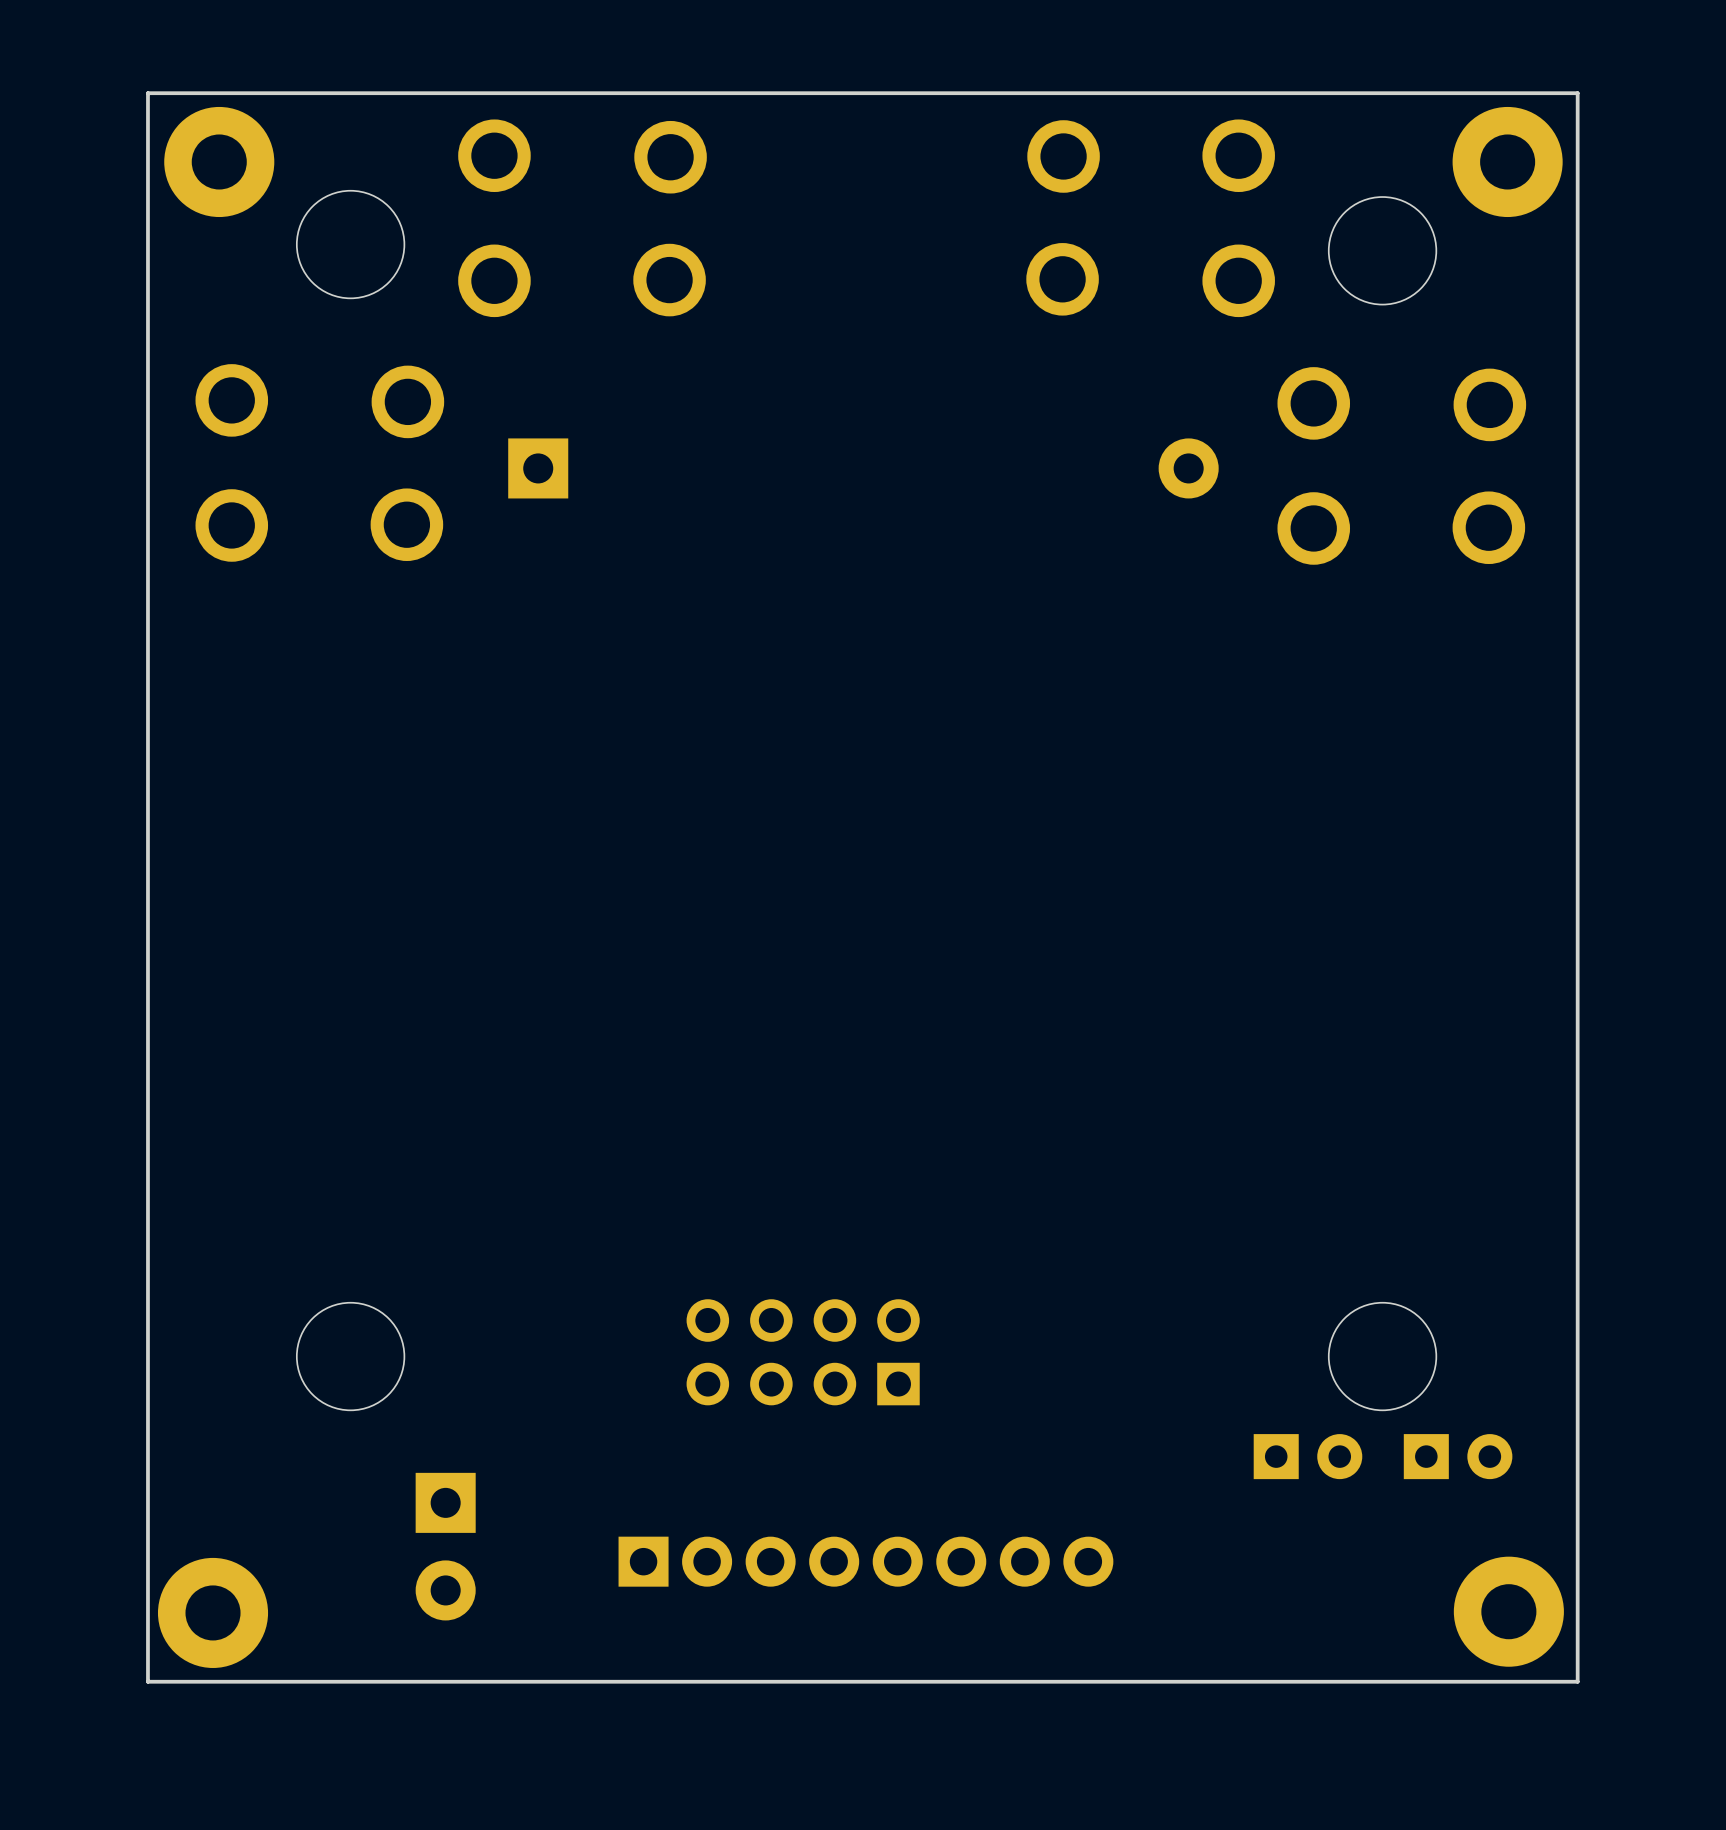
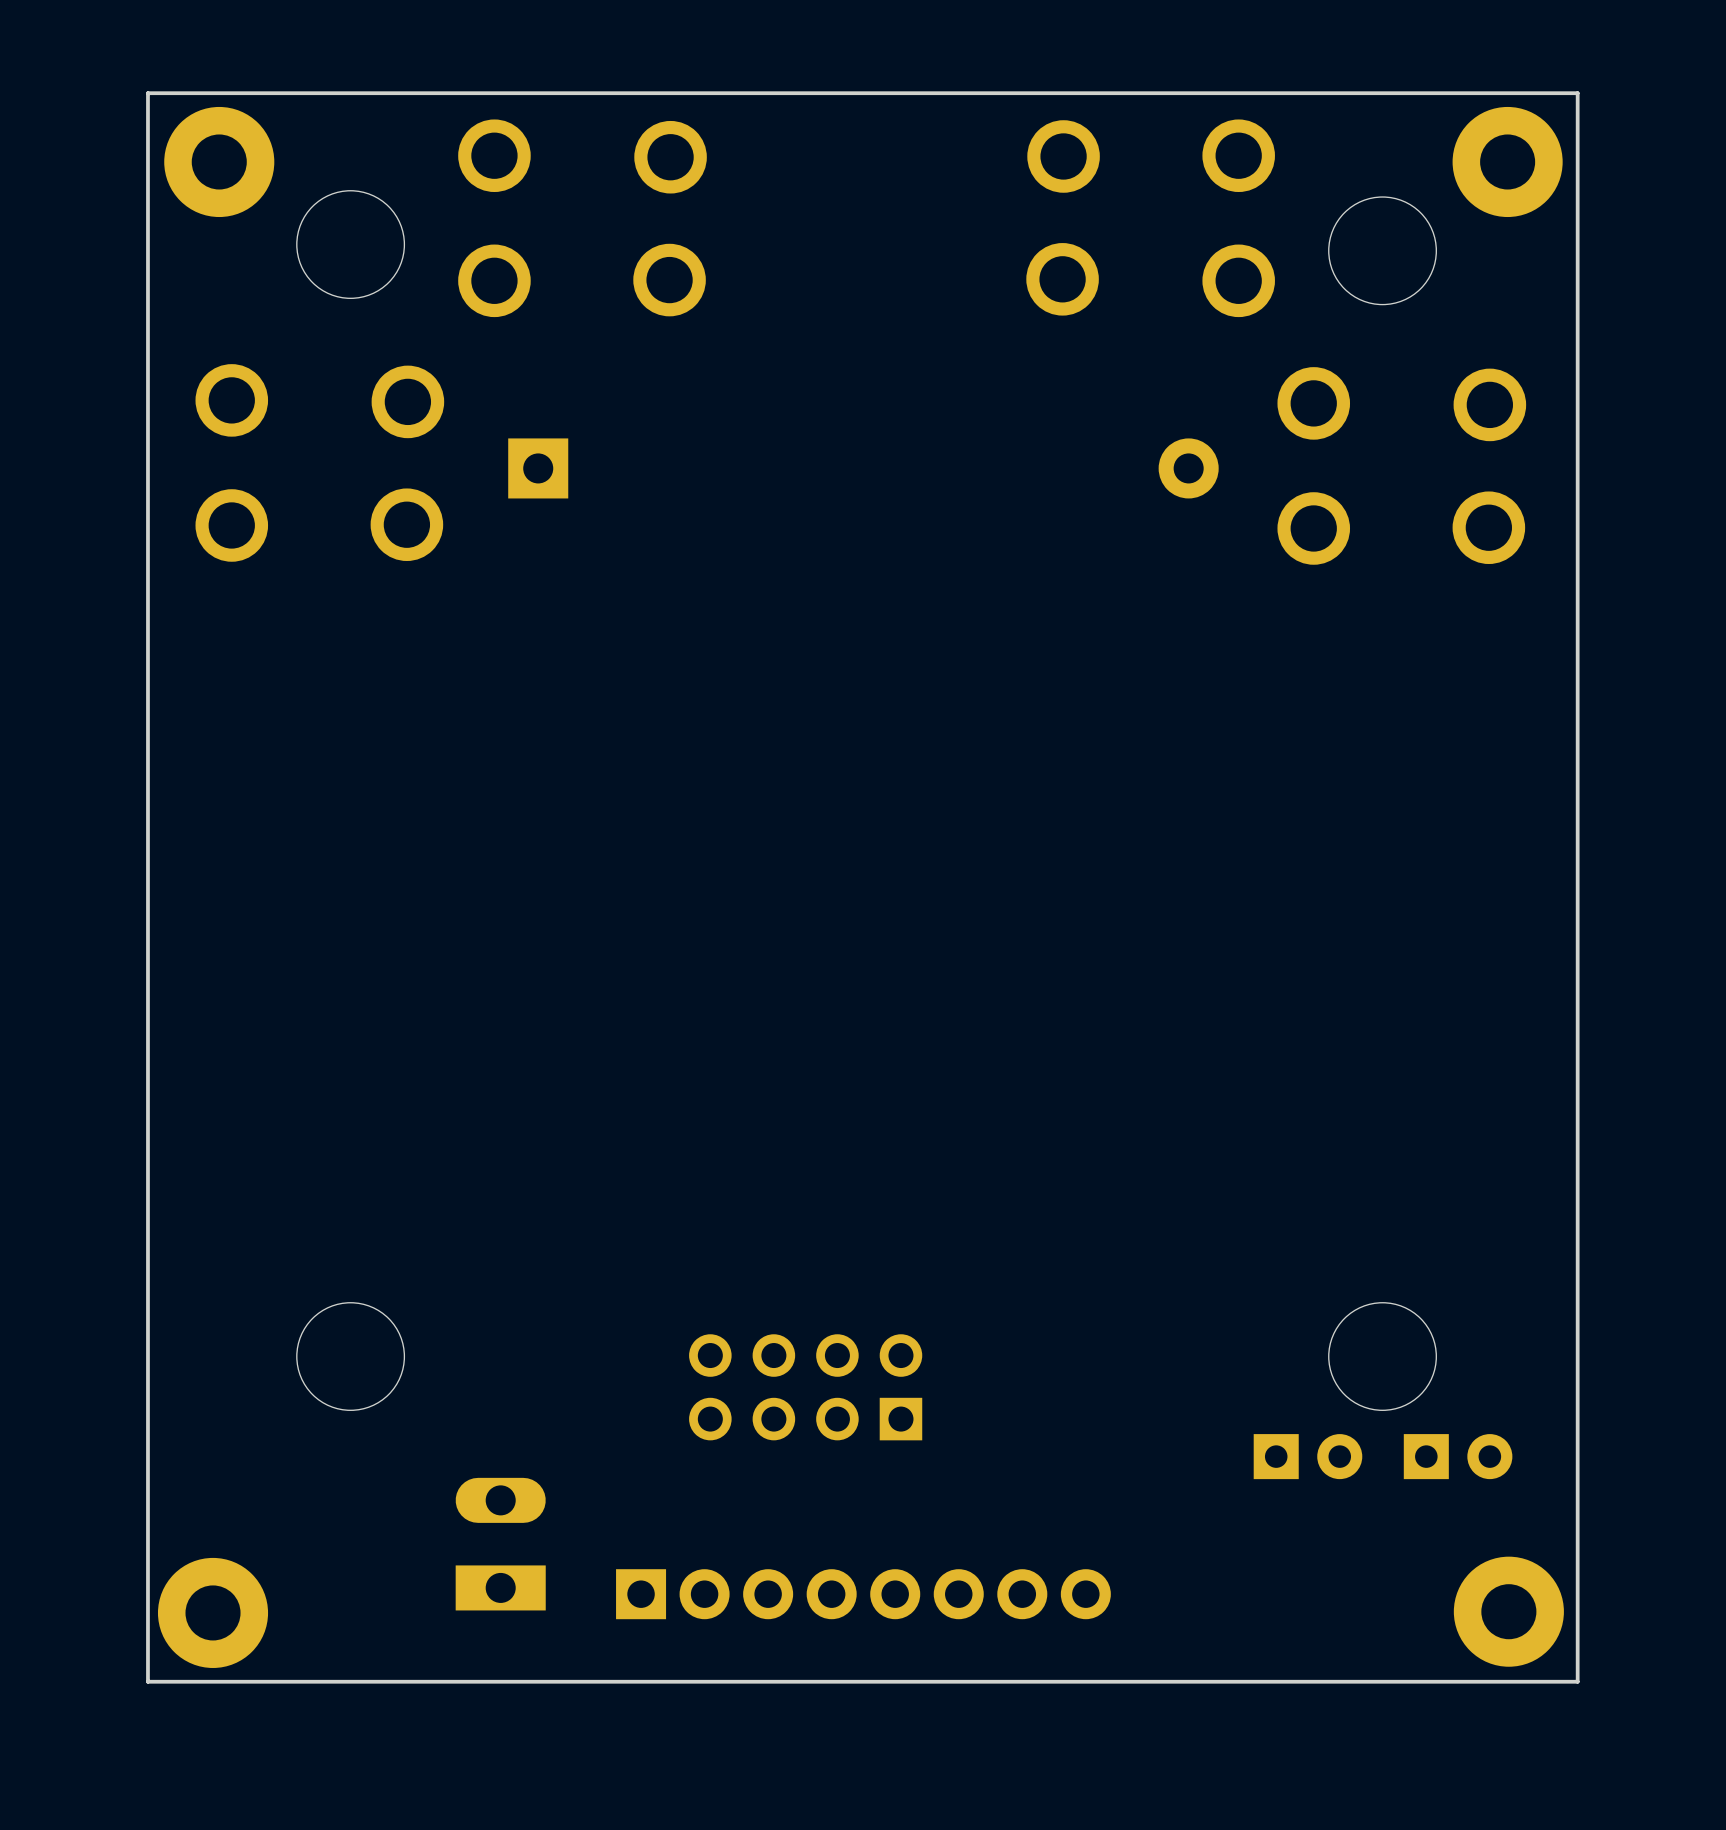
part position: (803, 1352) -> (805, 1387)
part: none -> (500, 1544)
part: (445, 1546) -> none
part position: (865, 1561) -> (863, 1594)

